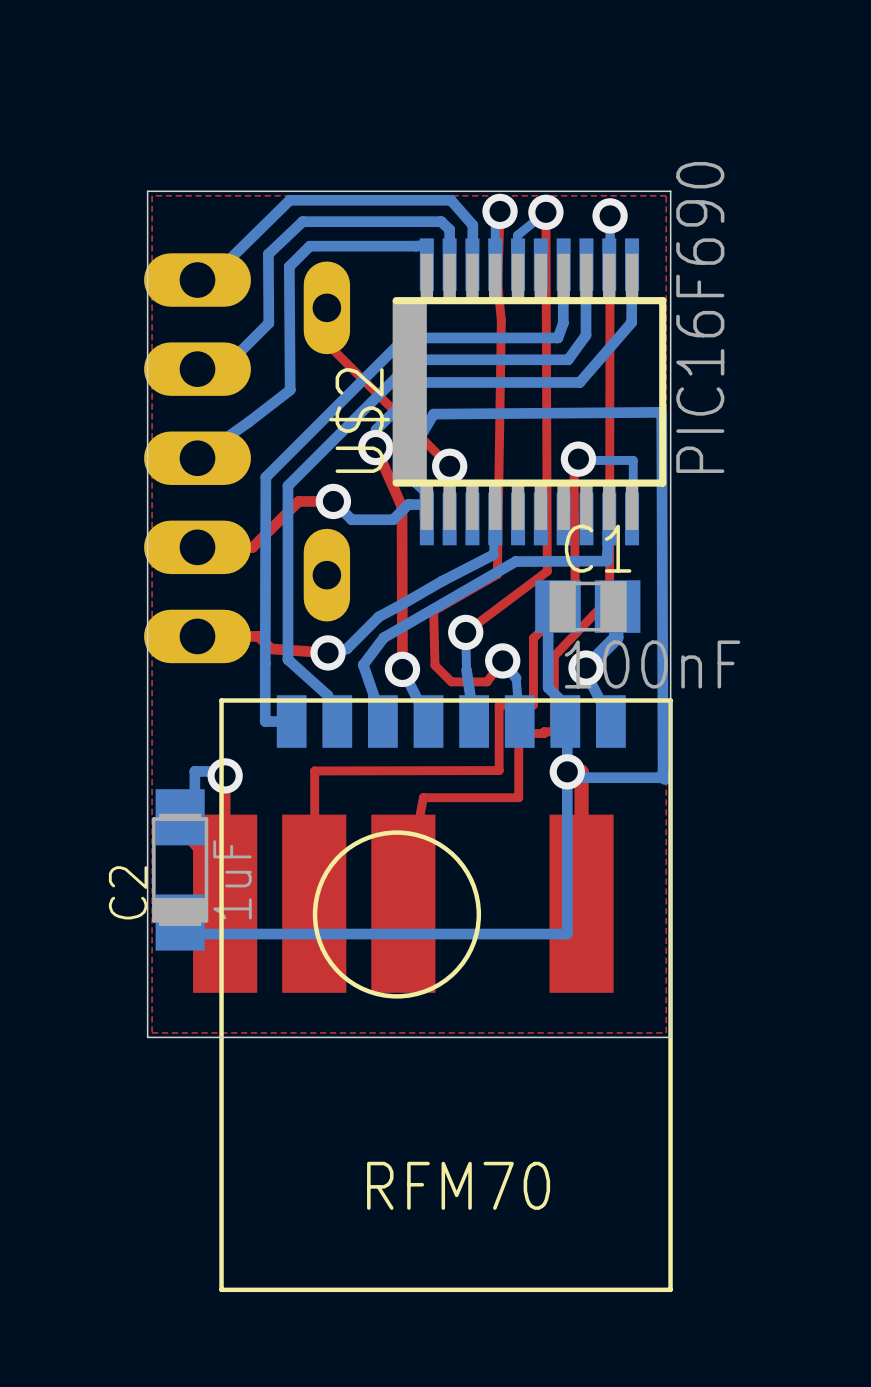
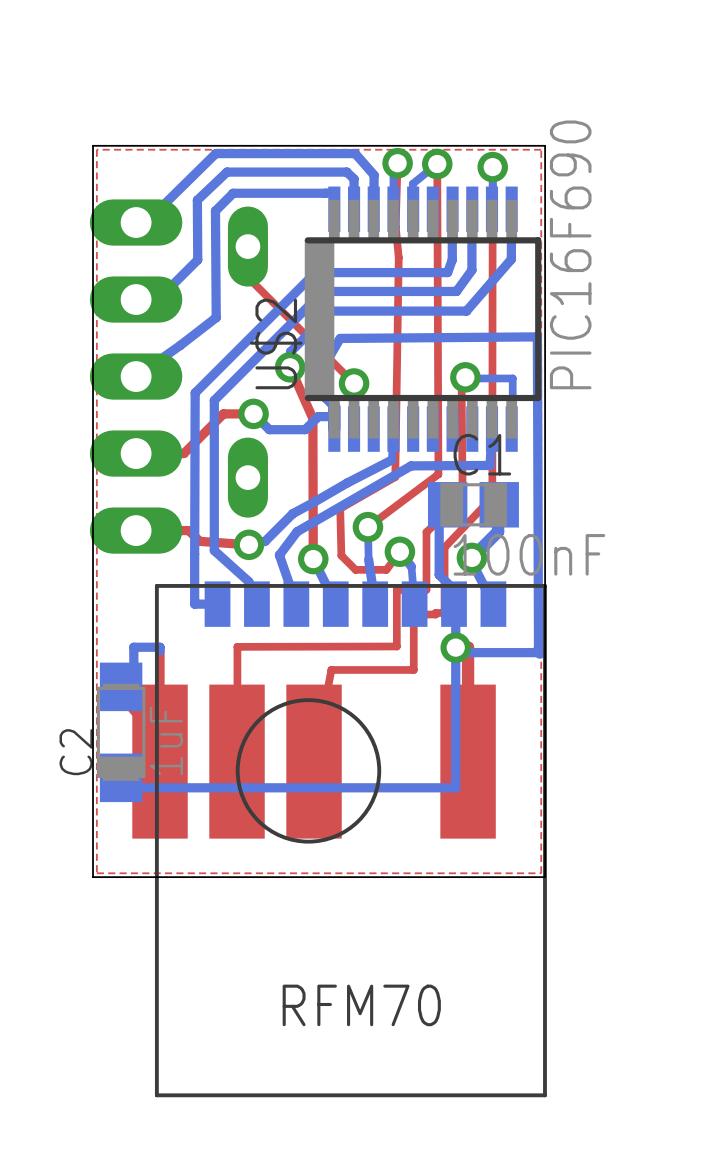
via: (225, 775) -> none

